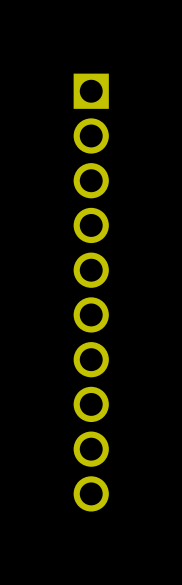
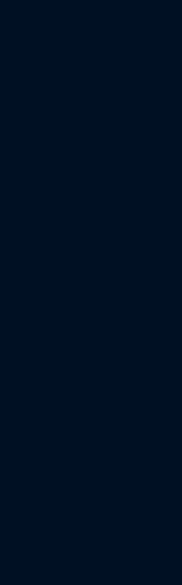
part: (91, 292) -> none

